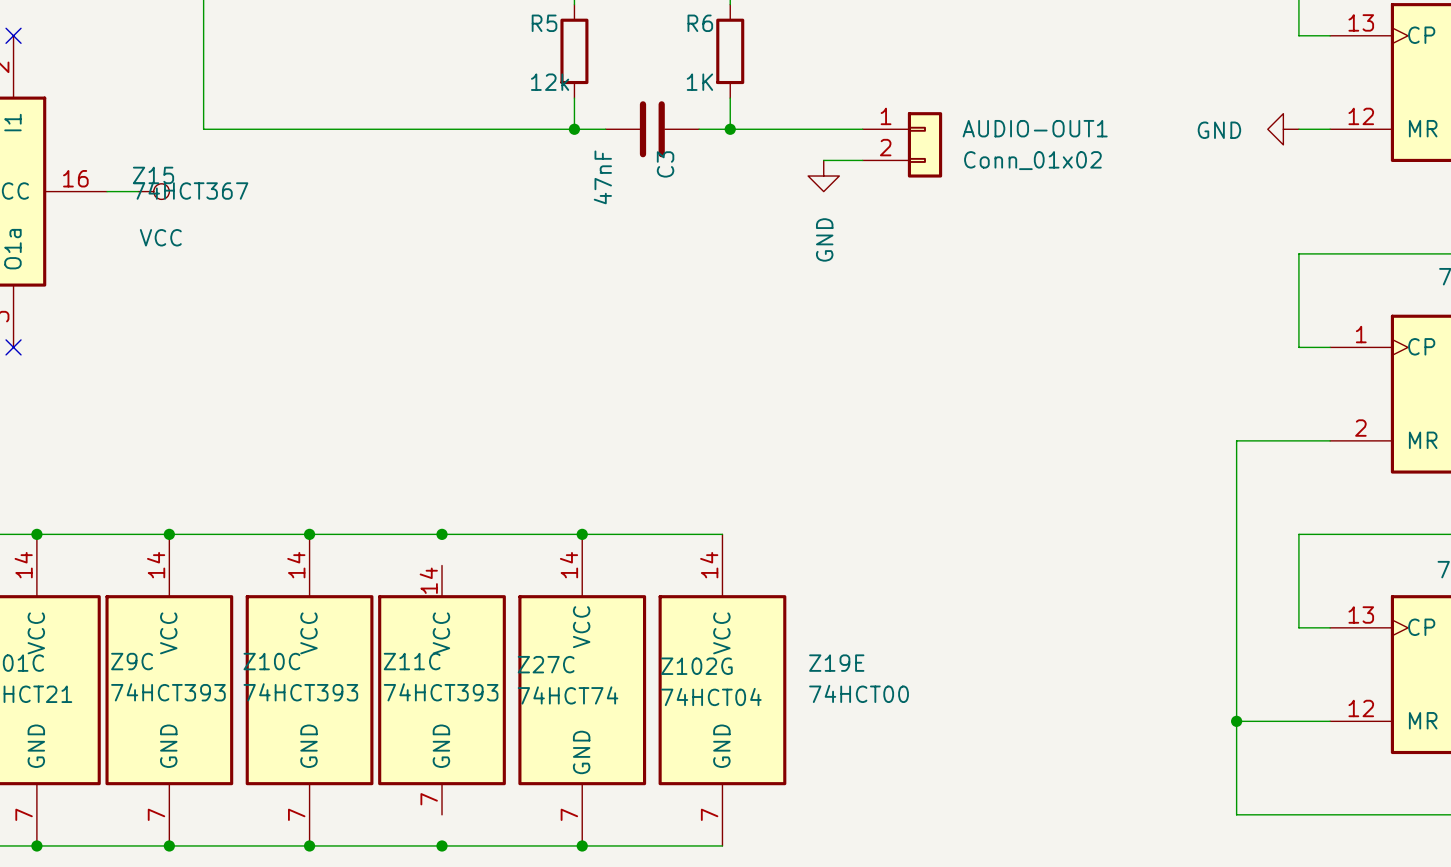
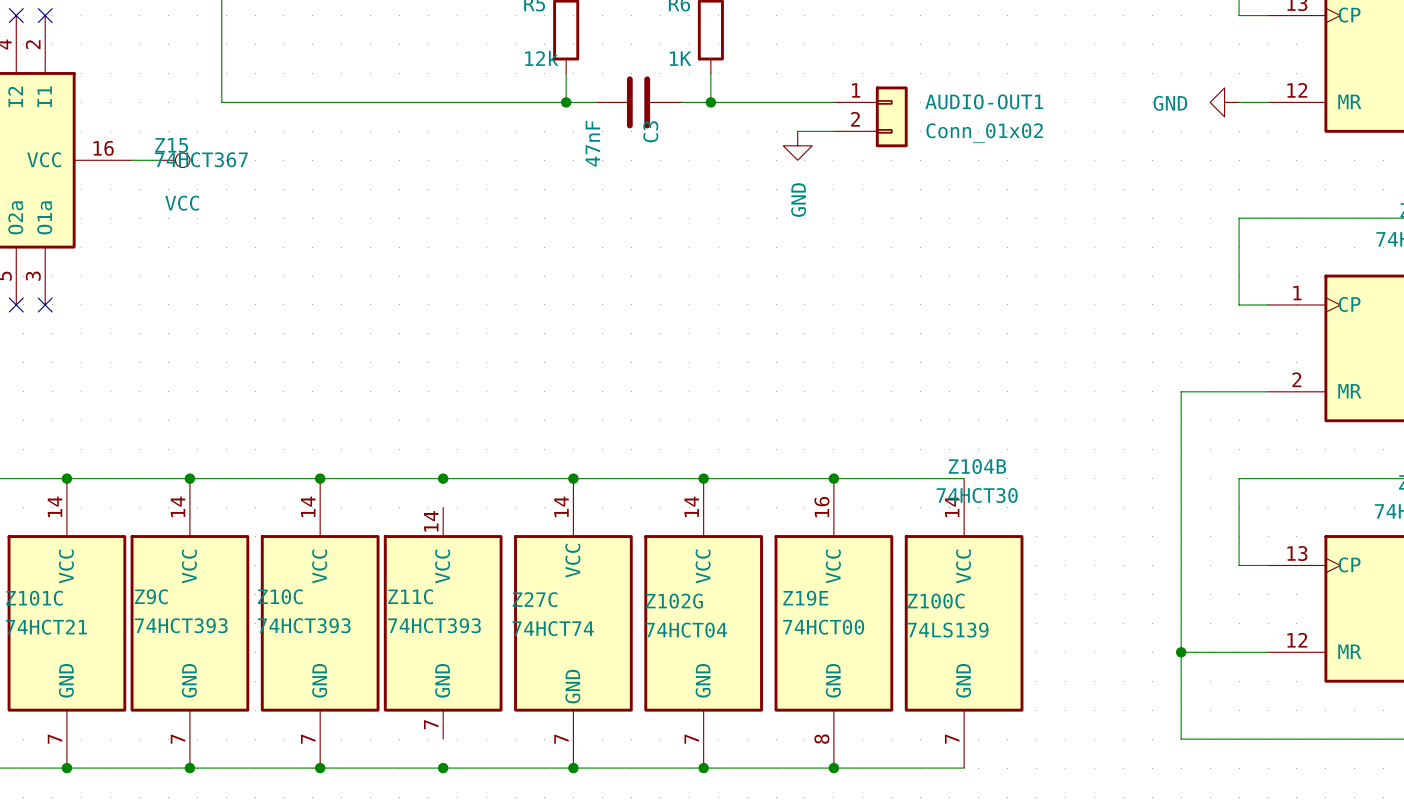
wire: none -> (703, 478) (964, 478)
junction: none -> (703, 478)
junction: none -> (833, 478)
Z100C: none -> 74LS139 (833, 623)
Z104B: none -> 74HCT30 (964, 623)
wire: none -> (703, 768) (964, 768)
junction: none -> (703, 768)
junction: none -> (833, 768)

